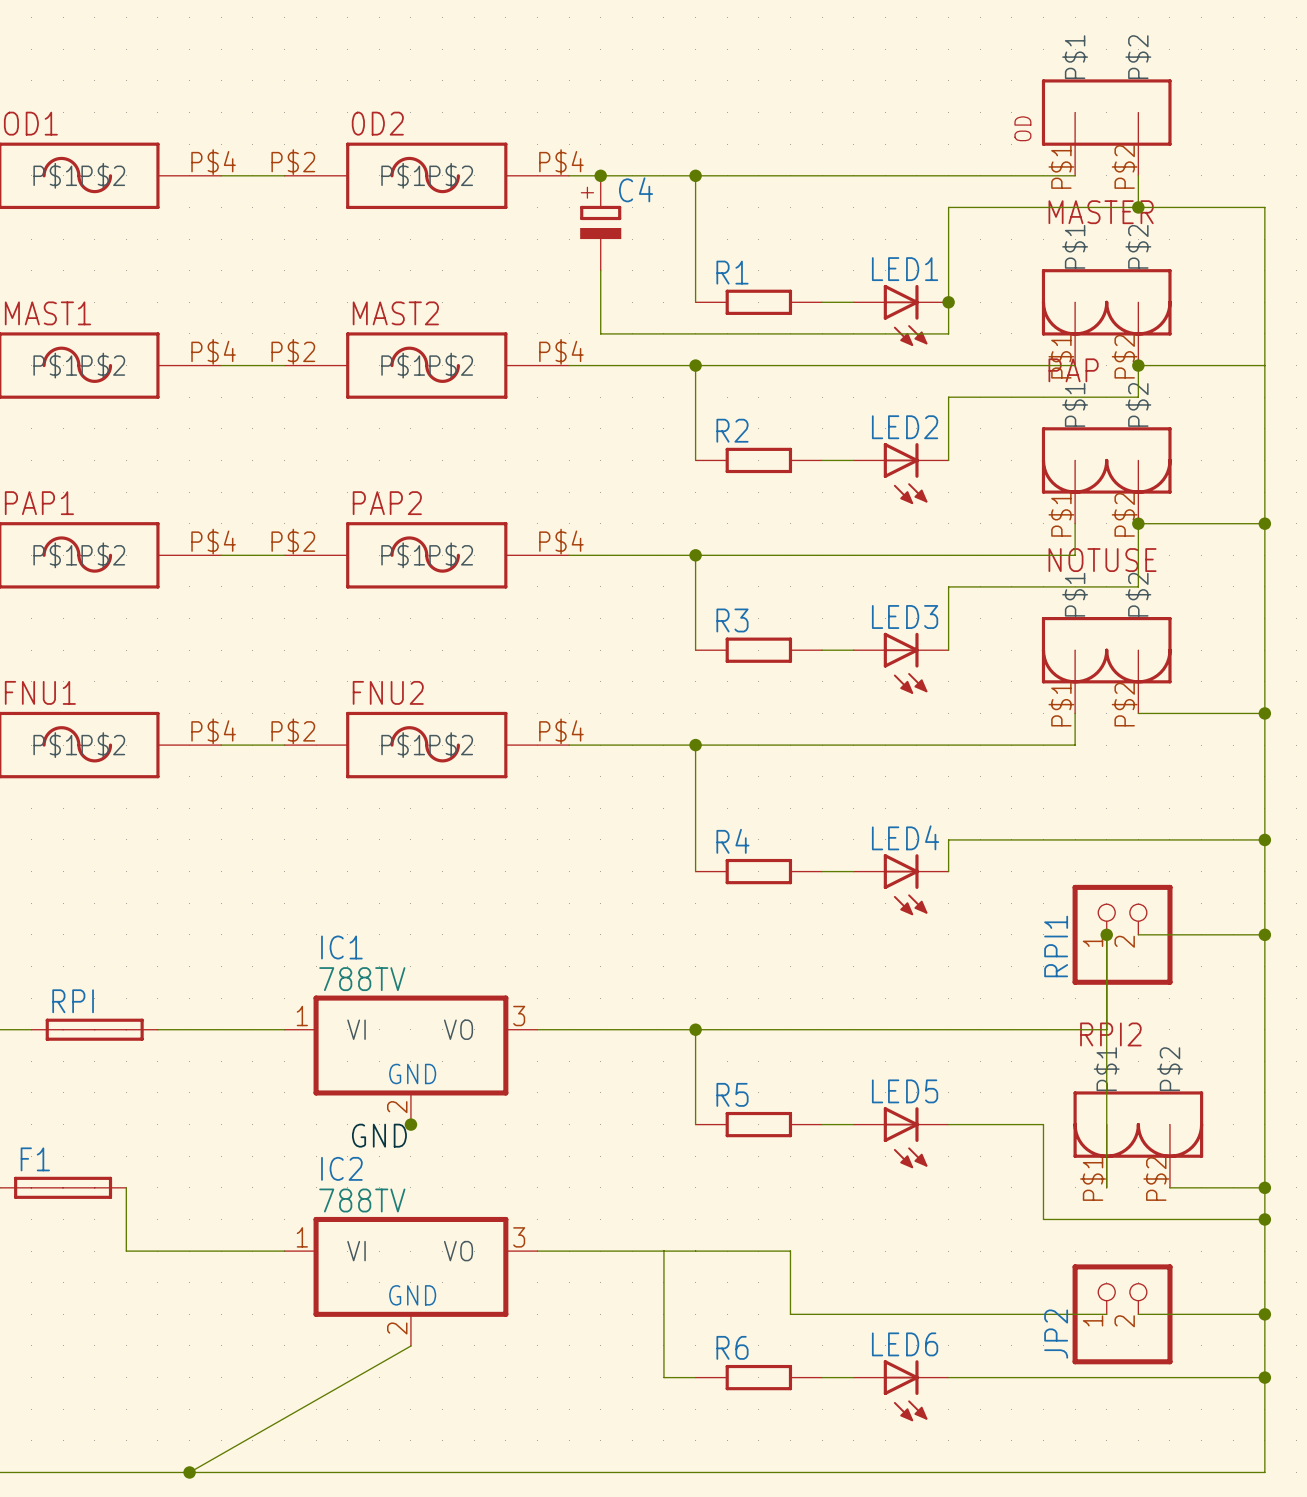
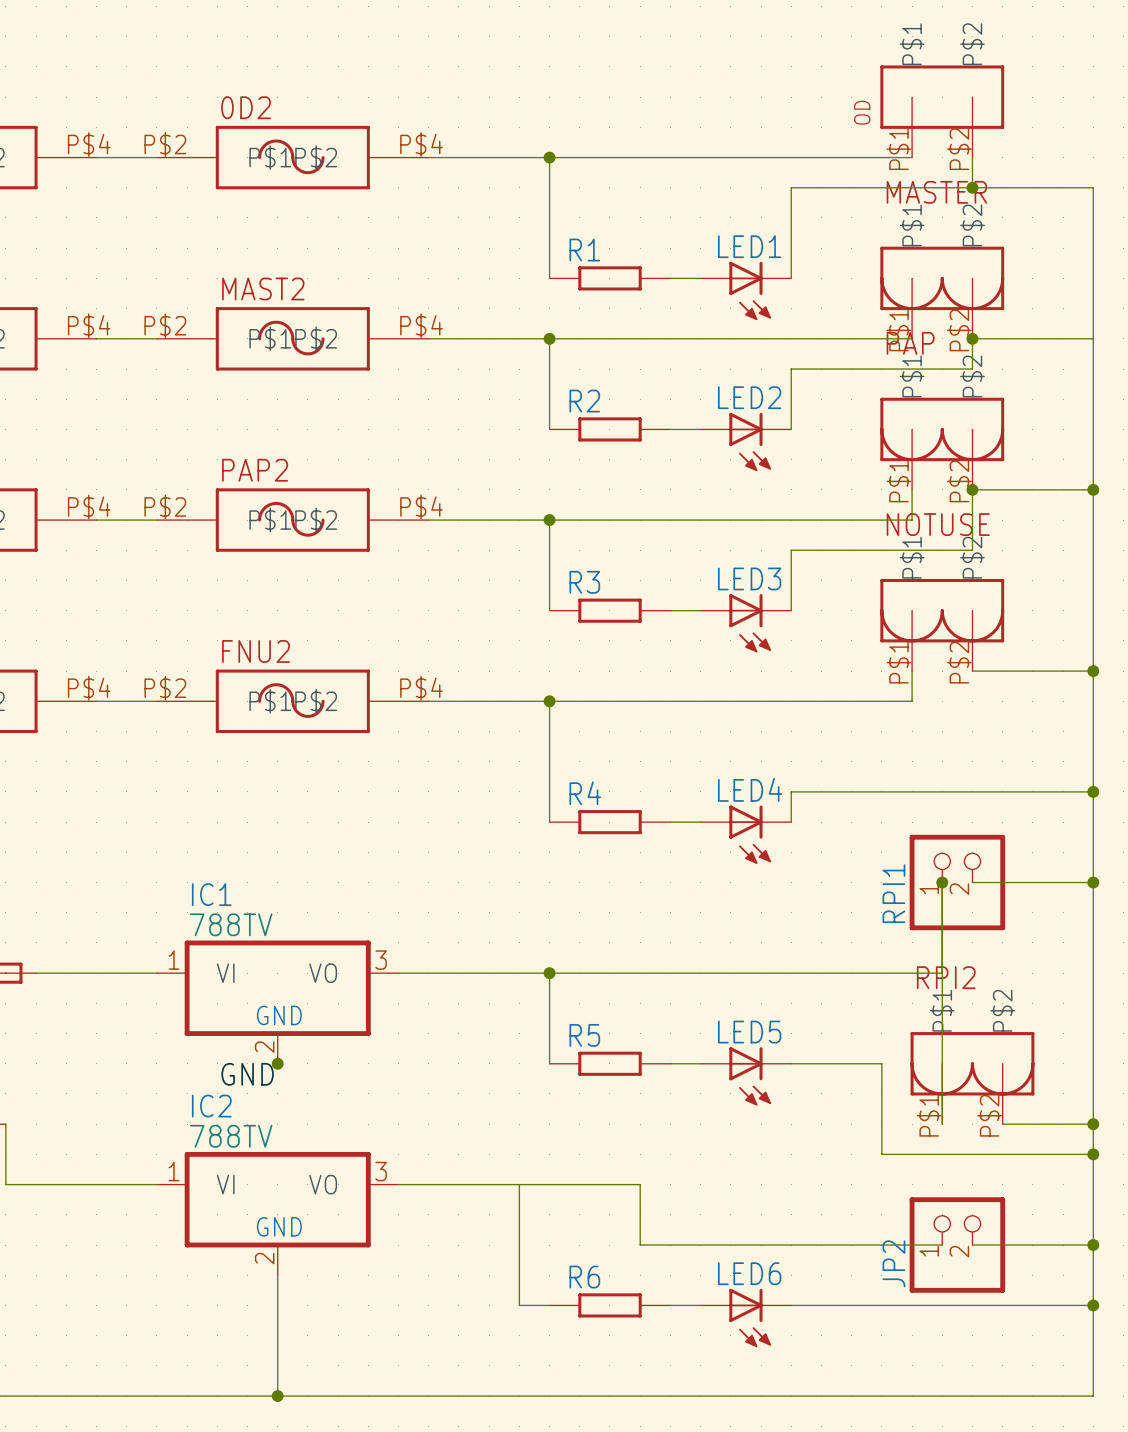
junction: (600, 175) -> none
C4: (600, 223) -> none
wire: (600, 270) (600, 333) (948, 333) (948, 302) -> none
junction: (948, 302) -> none
wire: (410, 1345) (189, 1472) -> (277, 1275) (277, 1396)
junction: (189, 1472) -> none
junction: none -> (277, 1396)

